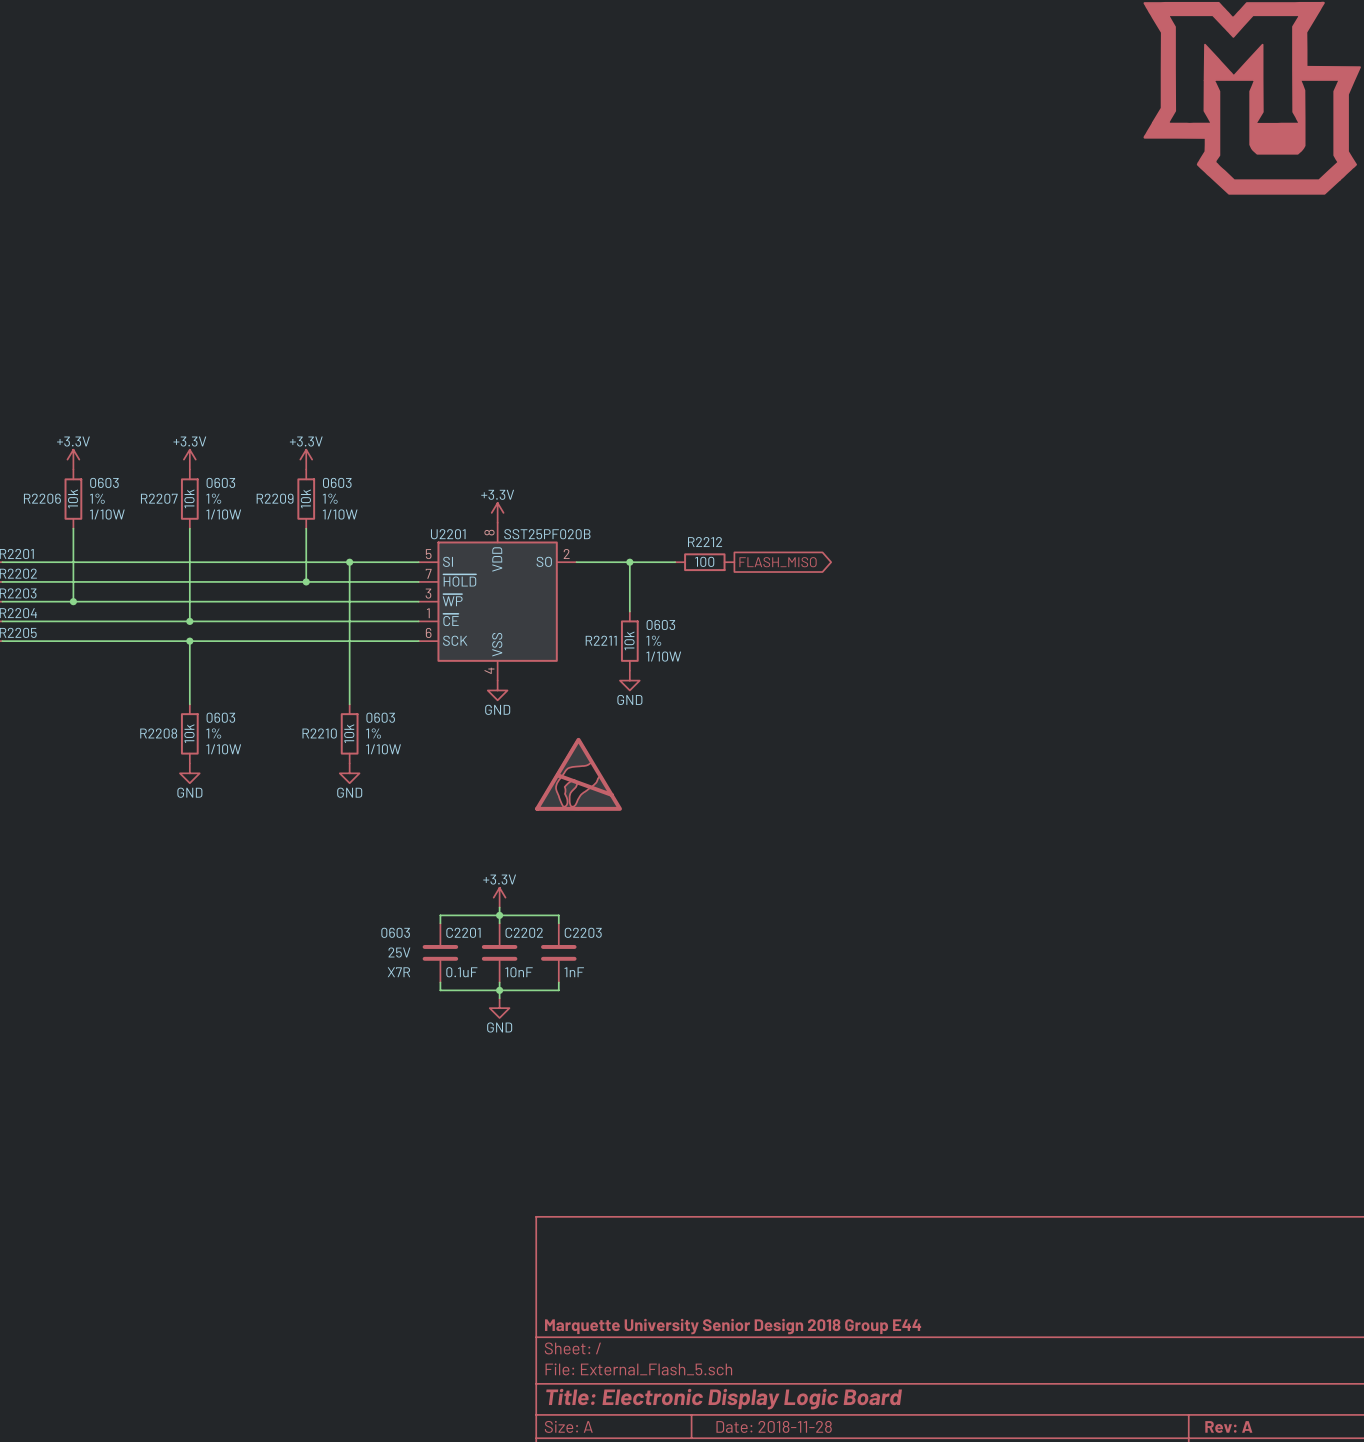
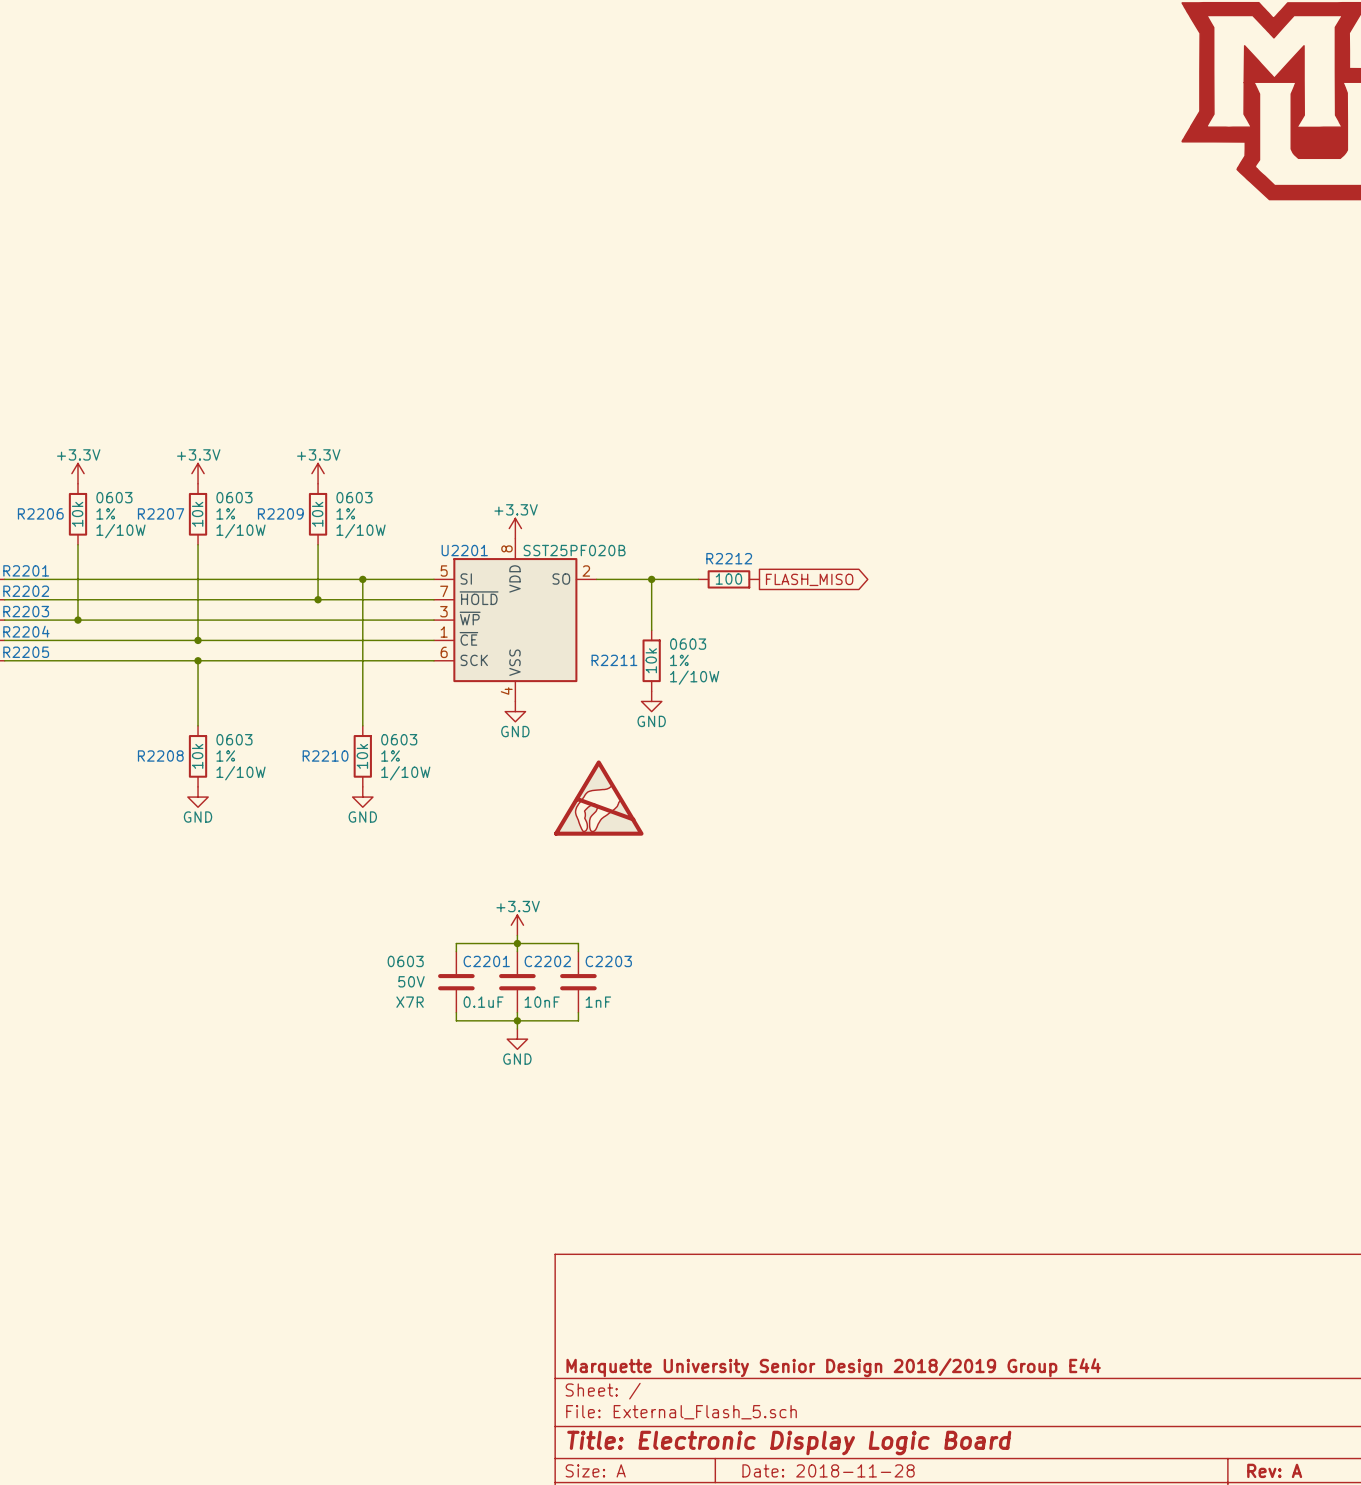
C2201 text: 25V (399, 952) -> 50V (411, 981)
title block: Marquette University Senior Design 2018 Group E44 (733, 1326) -> Marquette University Senior Design 2018/2019 Group E44 (833, 1367)

